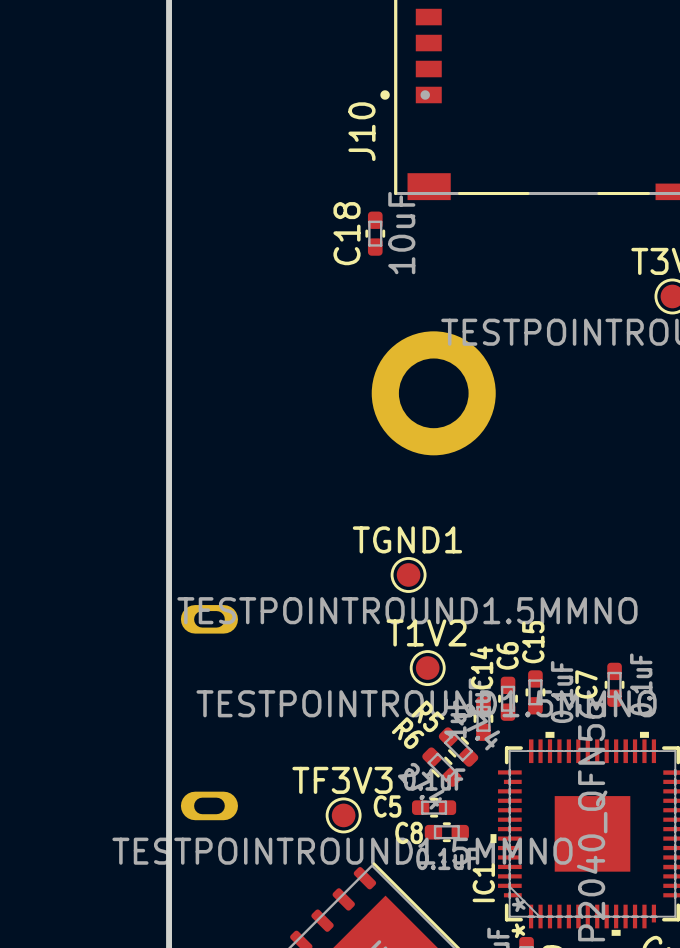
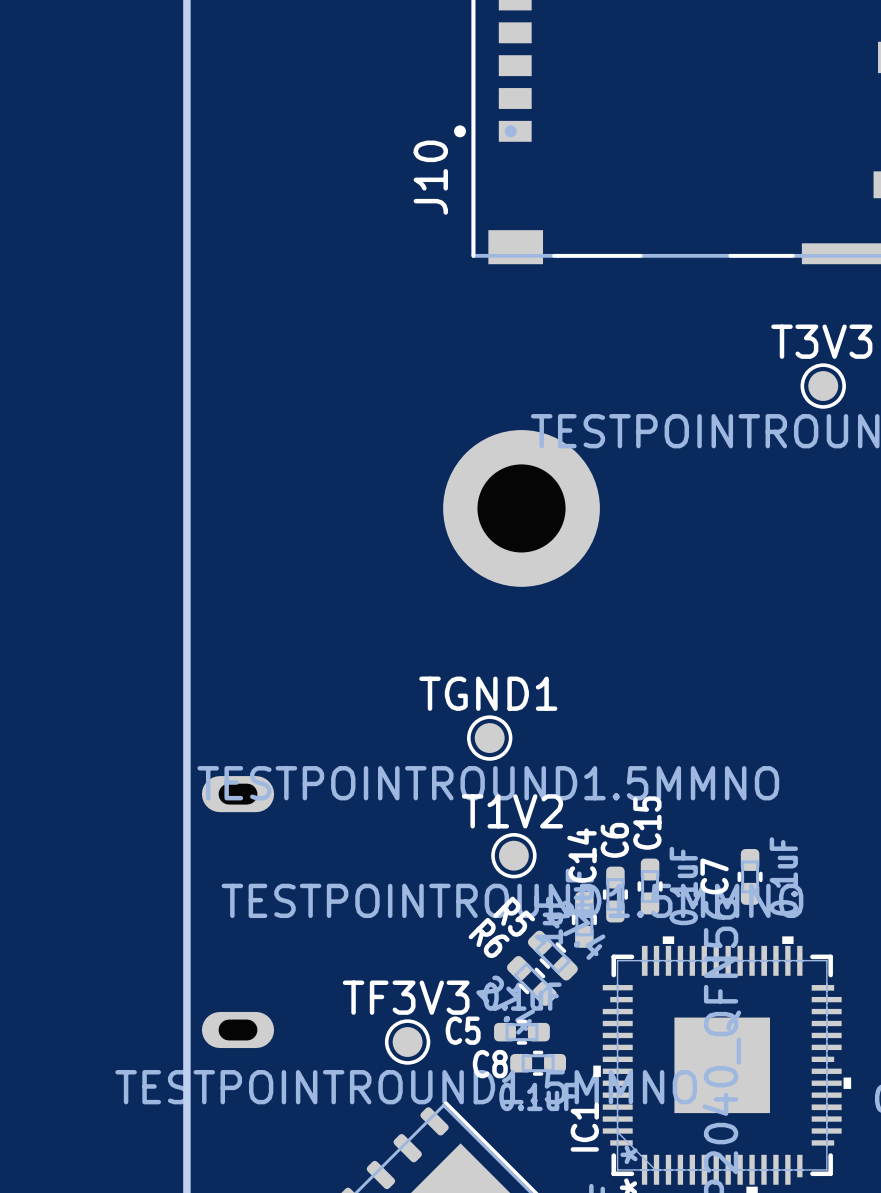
C18: 10uF (375, 233) -> none

